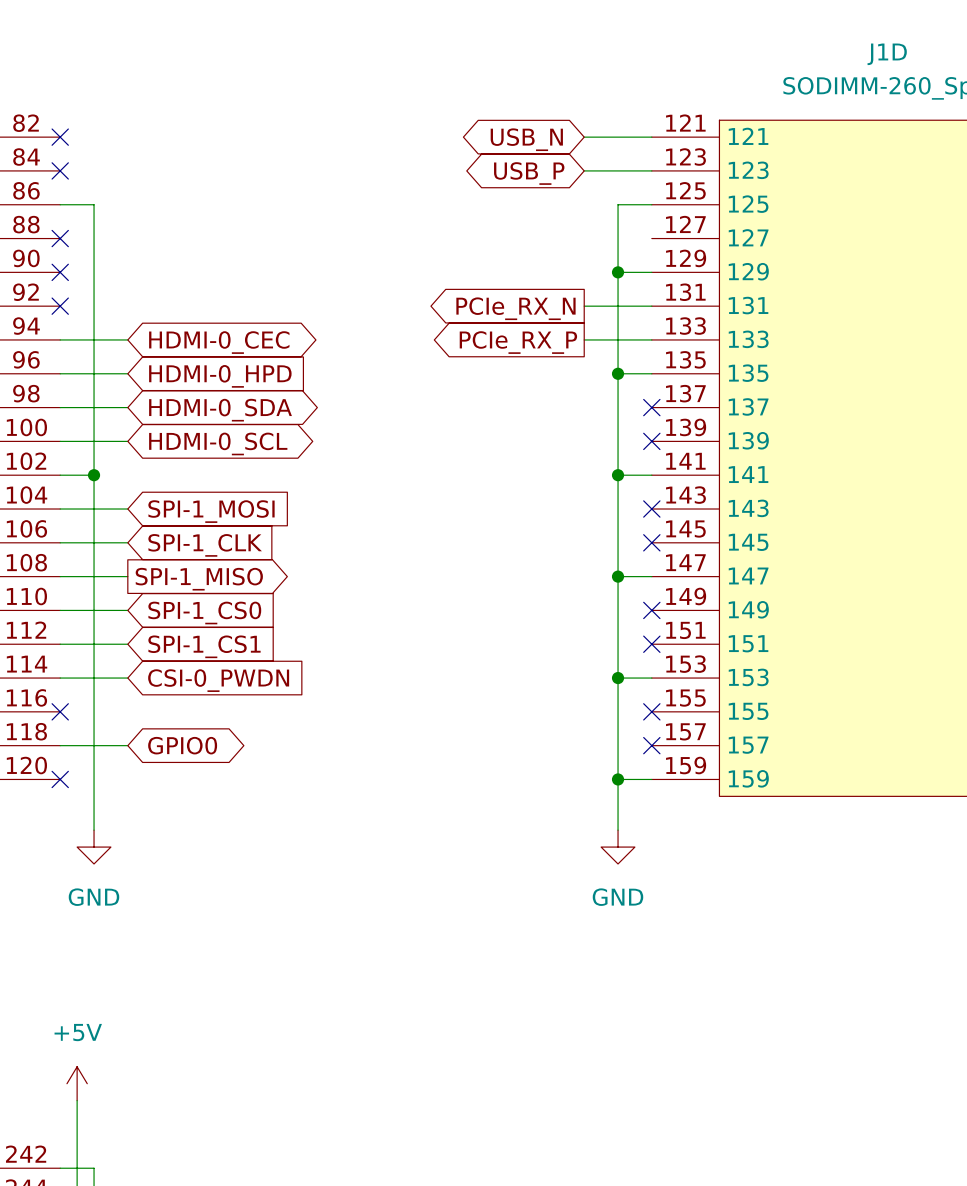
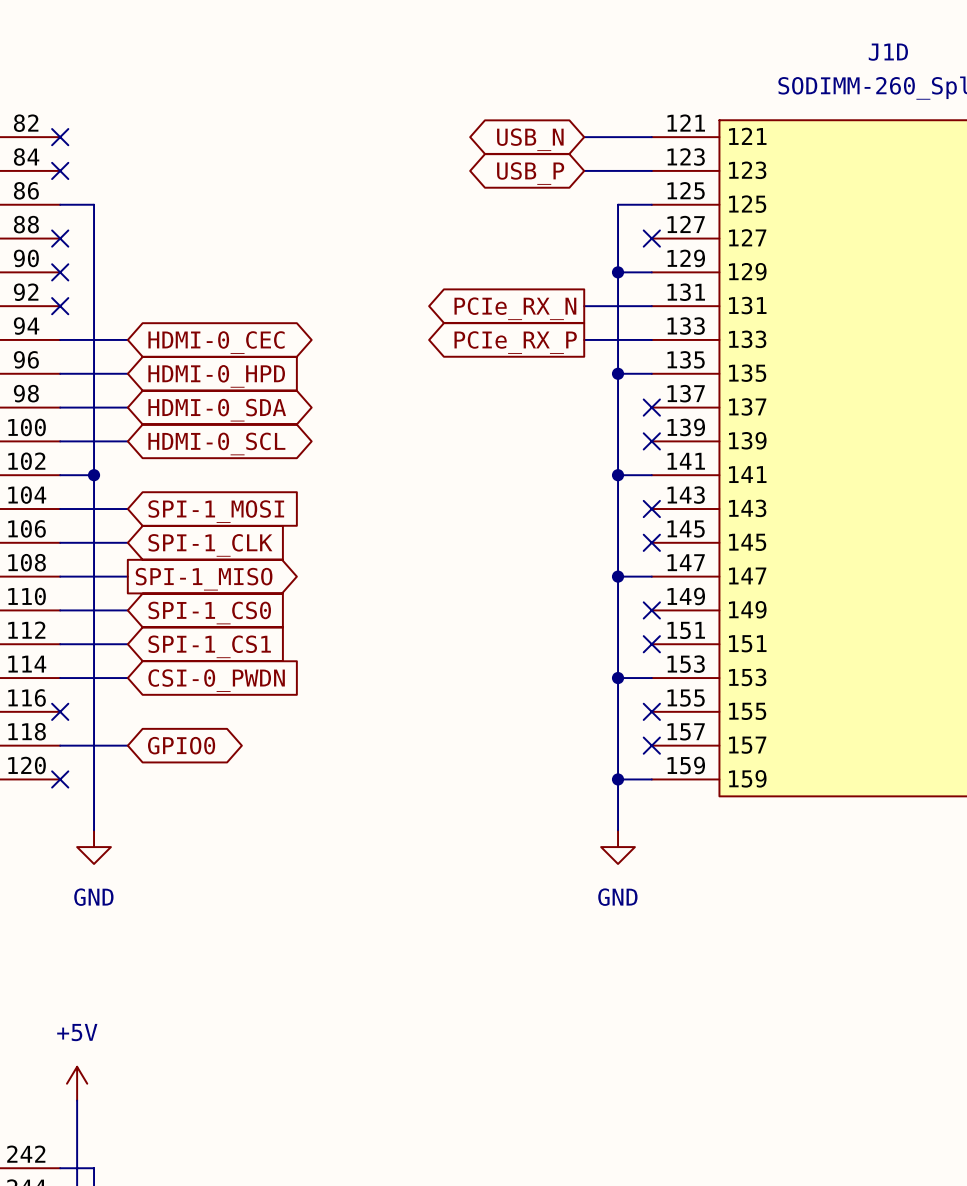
no-connect mark: none -> (651, 238)

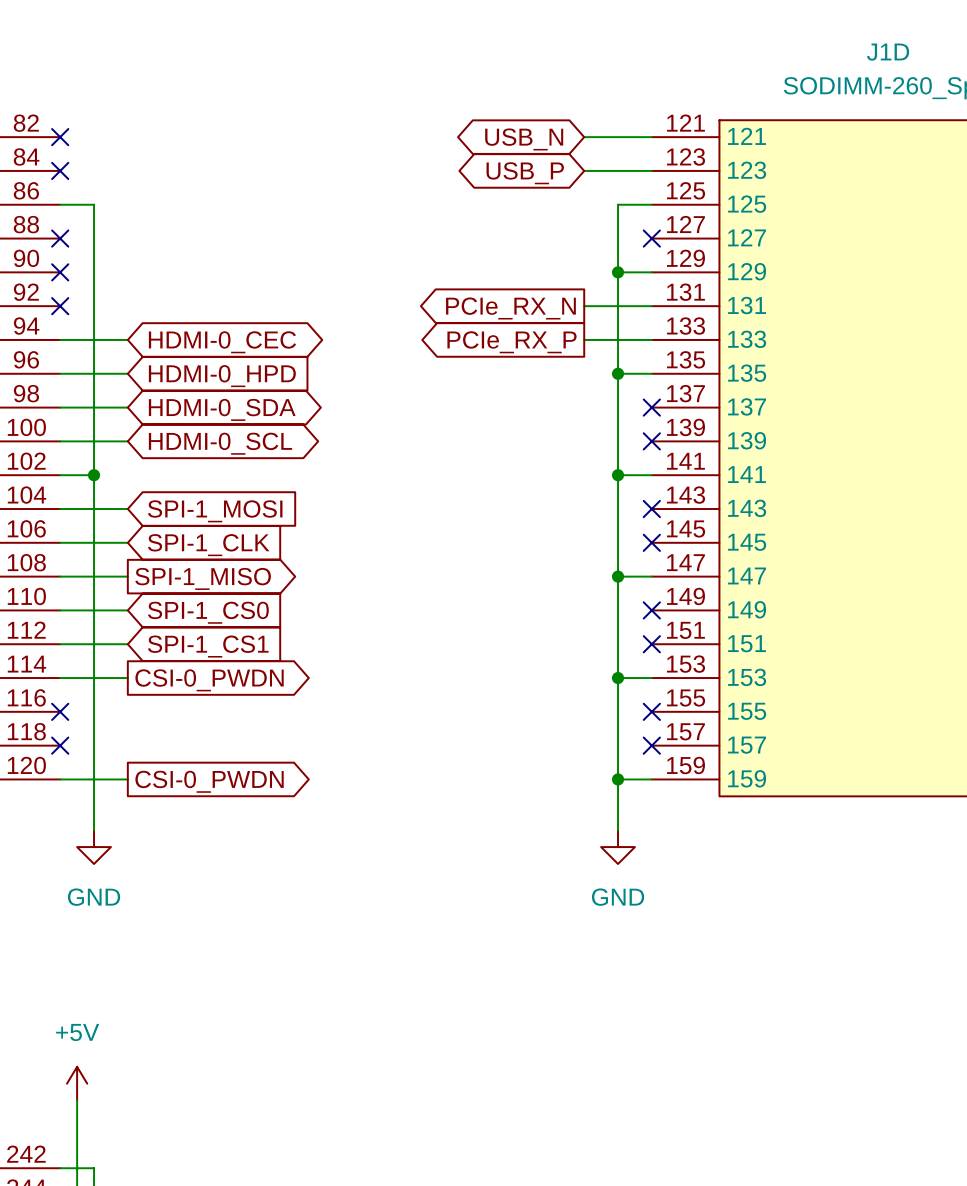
global label shape: input (216, 680) -> output (209, 680)
wire: (60, 745) (127, 745) -> (60, 779) (127, 779)
global label: GPIO0 (181, 745) -> none
no-connect mark position: (60, 779) -> (60, 745)
global label: none -> CSI-0_PWDN (209, 781)

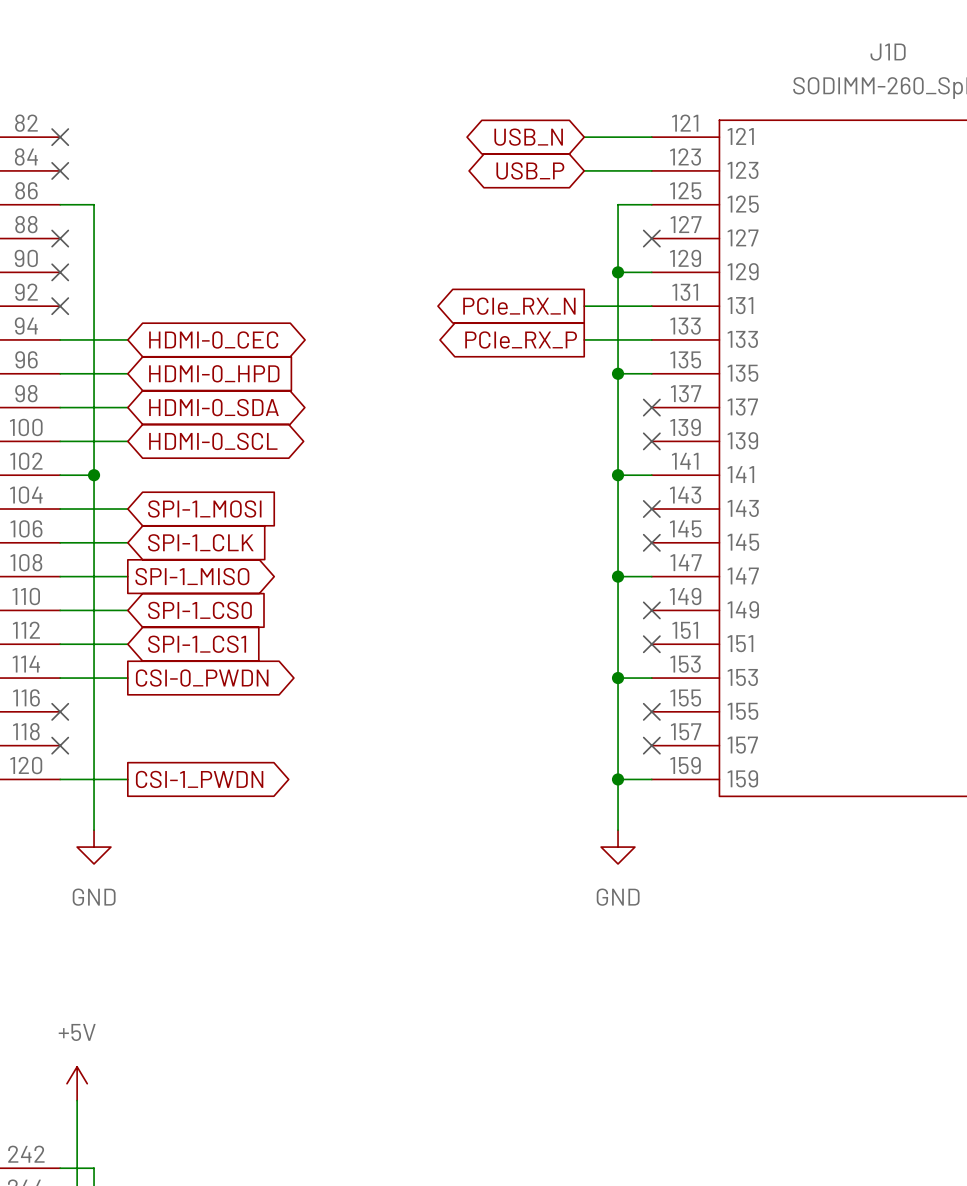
global label: CSI-0_PWDN (209, 781) -> CSI-1_PWDN (199, 779)

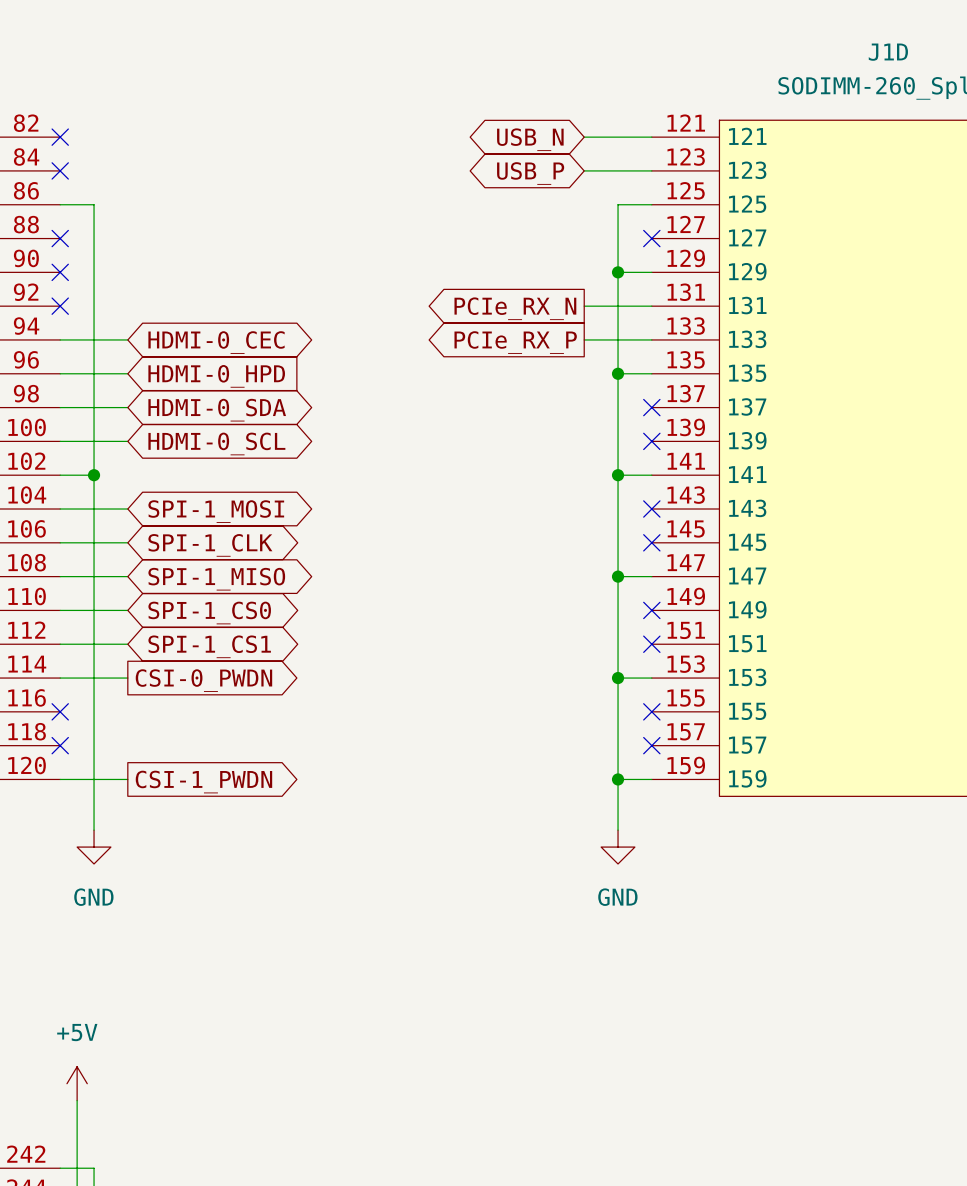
global label shape: input (204, 509) -> bidirectional (216, 511)
global label shape: input (200, 542) -> bidirectional (210, 545)
global label shape: output (192, 576) -> bidirectional (216, 579)
global label shape: input (199, 610) -> bidirectional (209, 613)
global label shape: input (197, 644) -> bidirectional (209, 646)

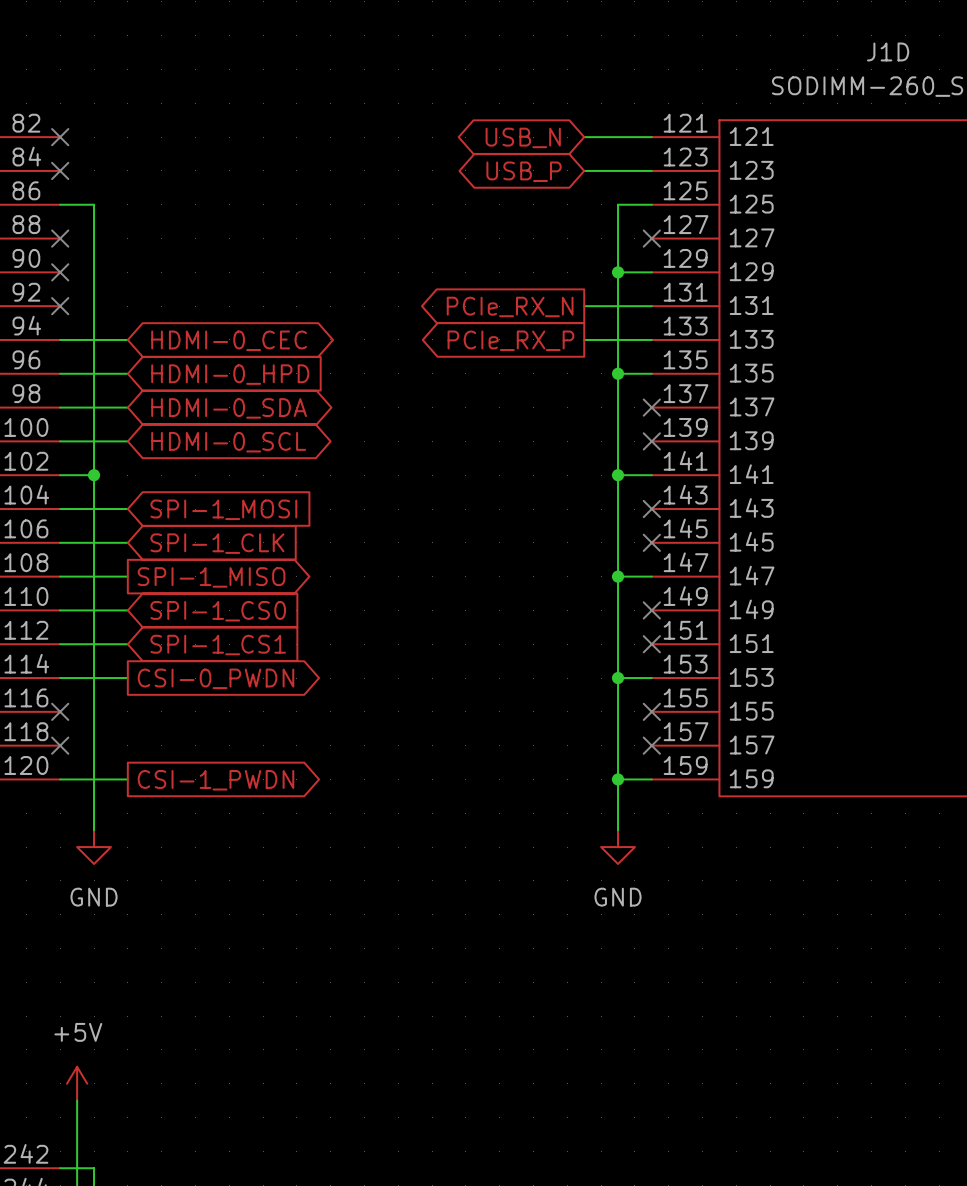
global label shape: bidirectional (216, 511) -> input (223, 509)
global label shape: bidirectional (210, 545) -> input (217, 543)
global label shape: bidirectional (216, 579) -> output (211, 577)
global label shape: bidirectional (209, 613) -> input (218, 611)
global label shape: bidirectional (209, 646) -> input (218, 645)

